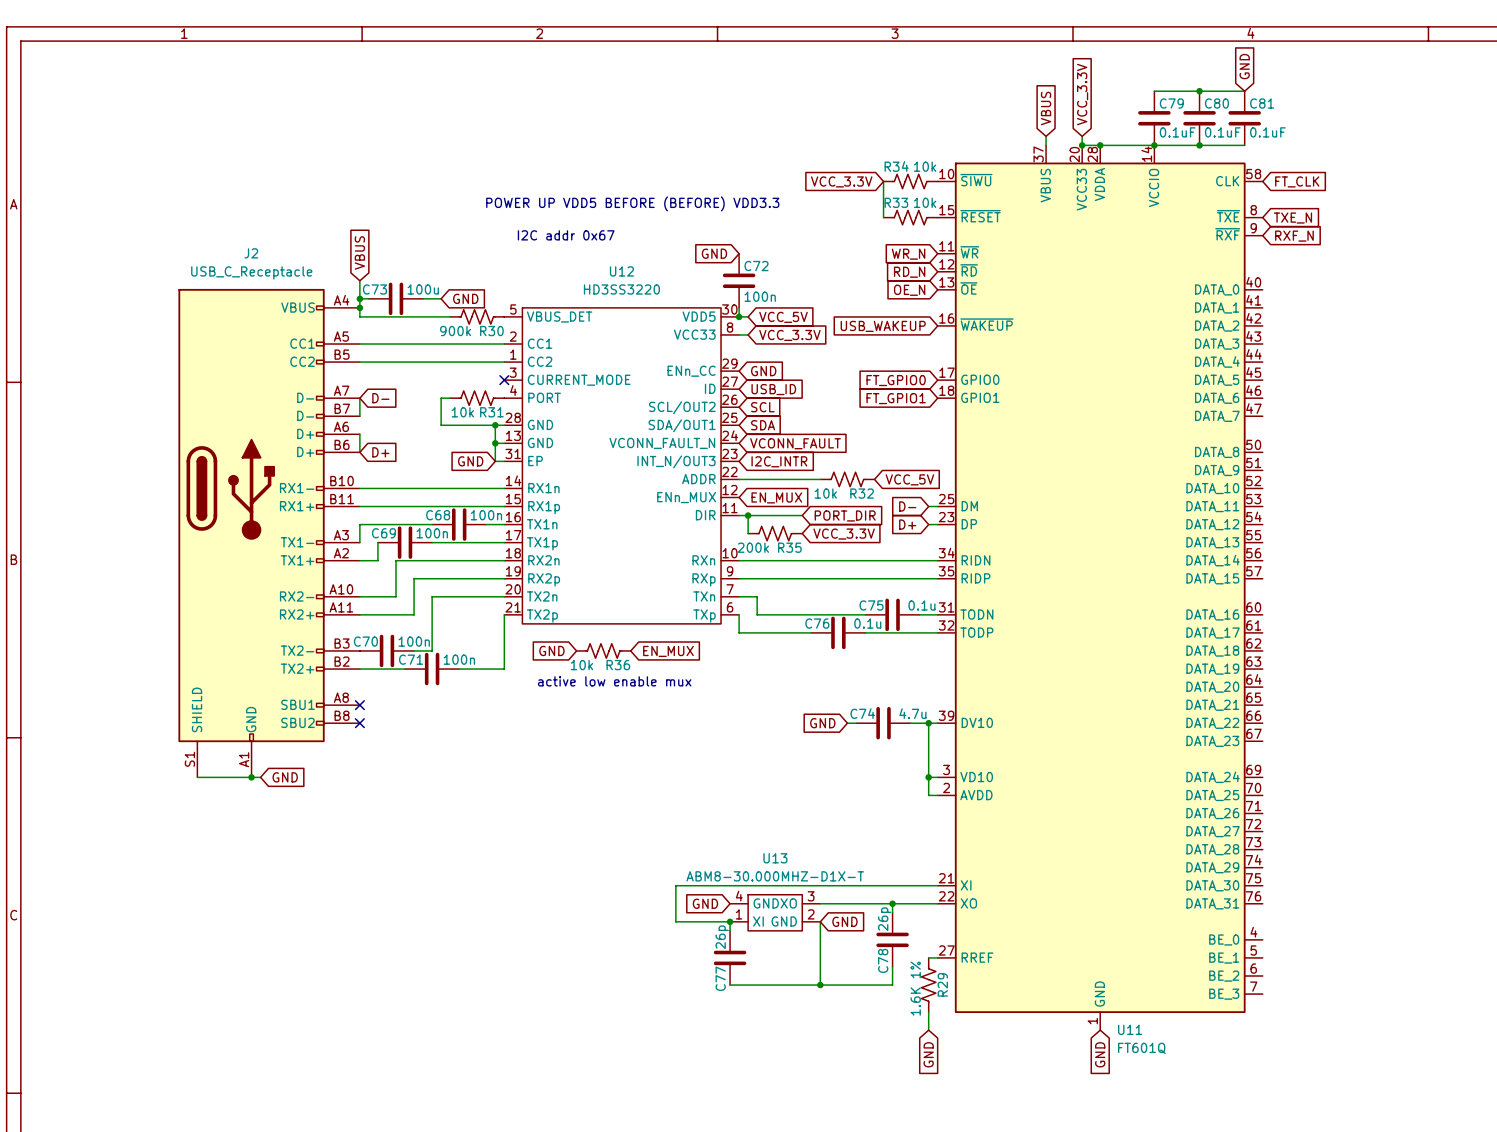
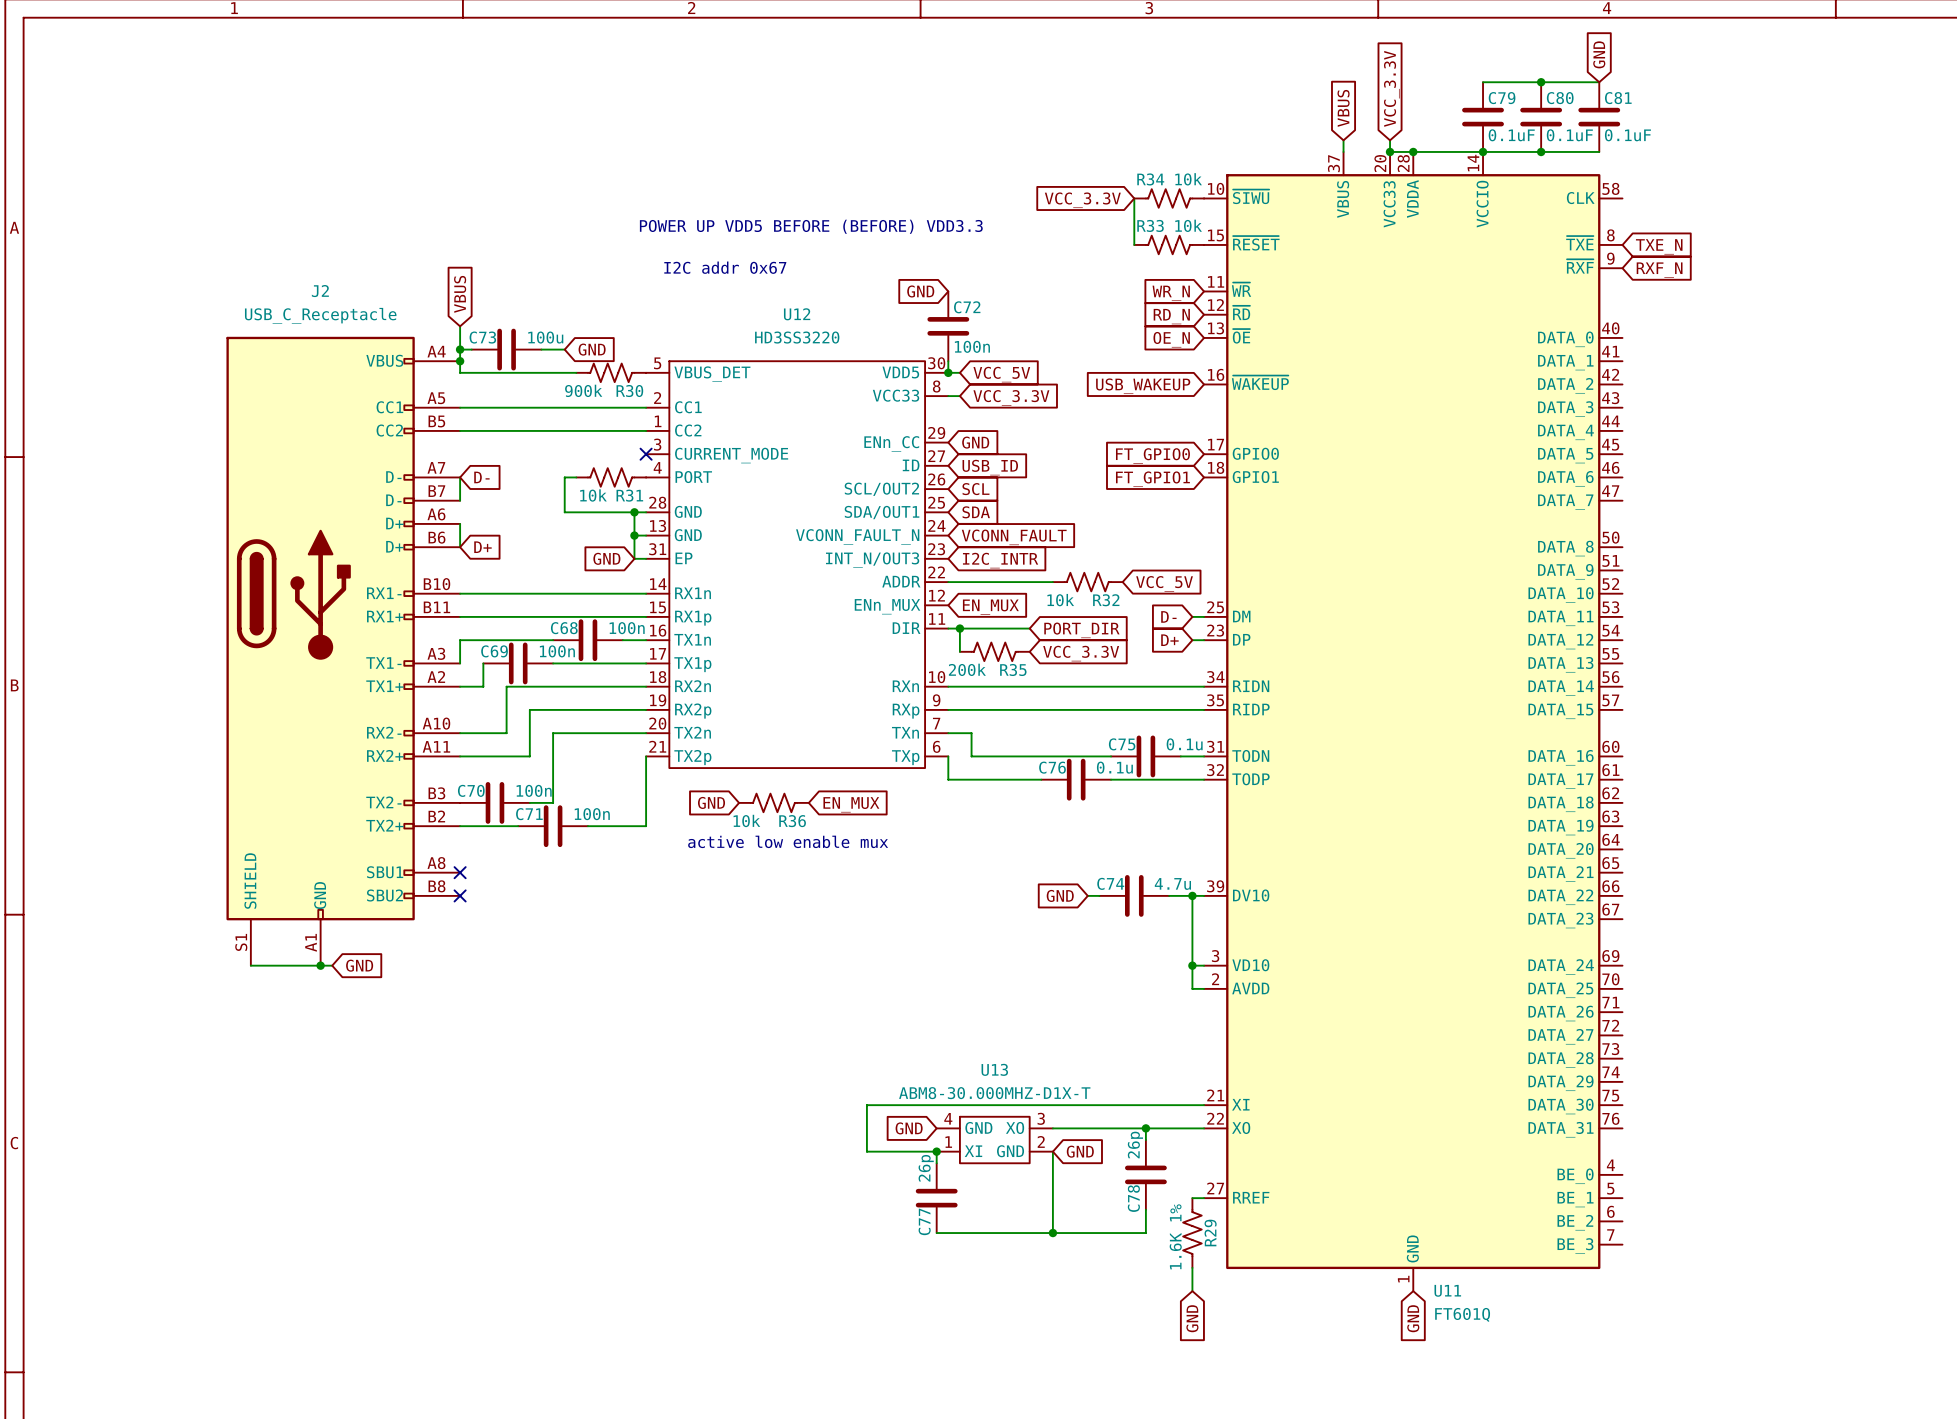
global label: FT_CLK (1297, 181) -> none

